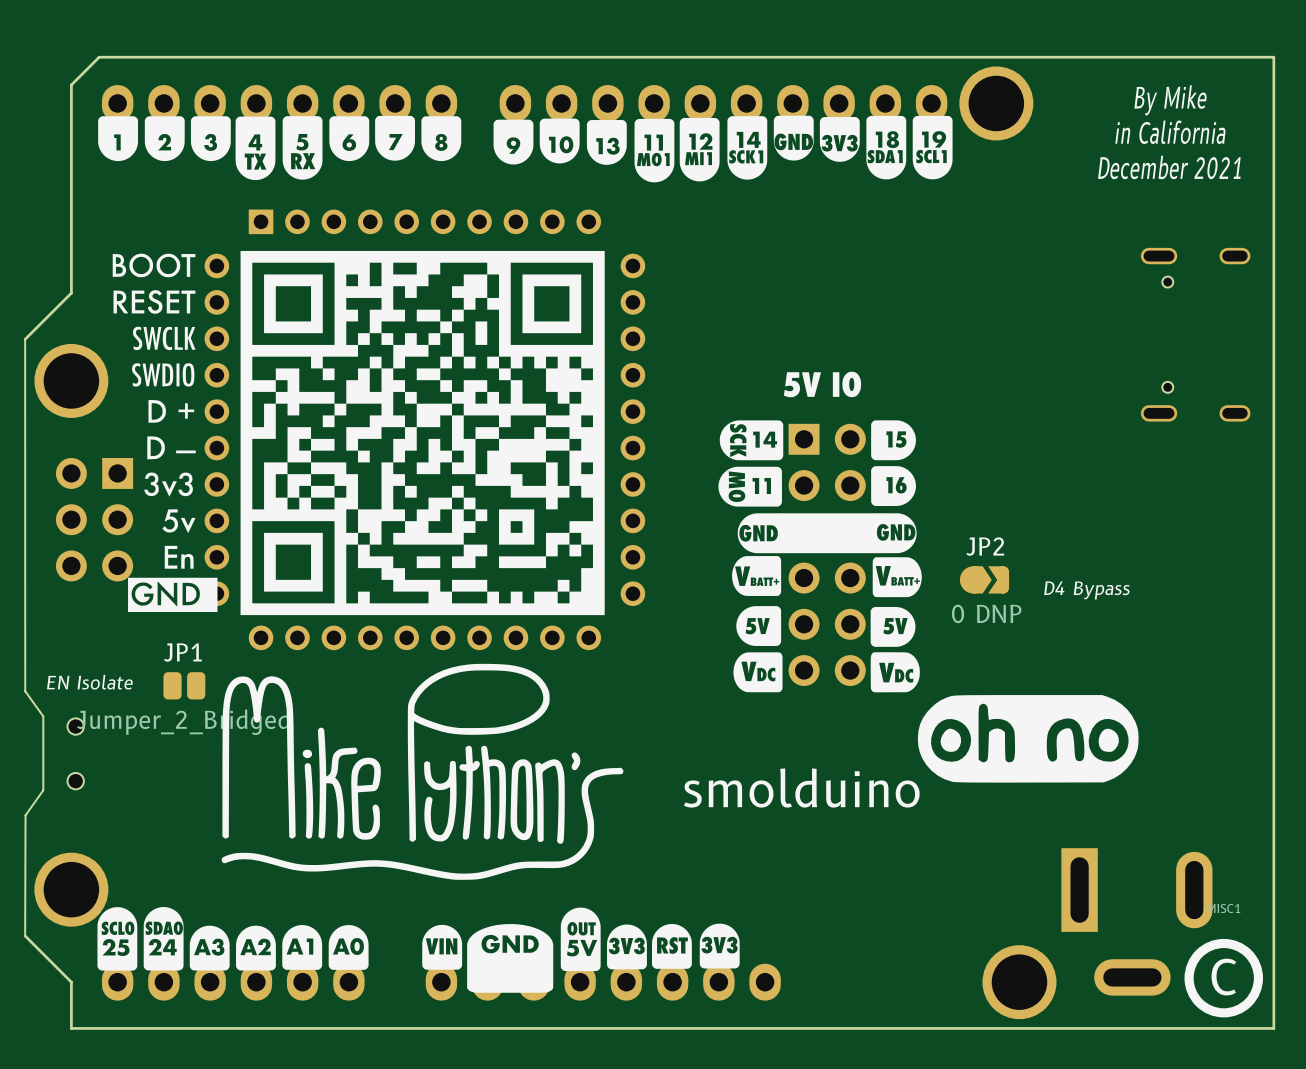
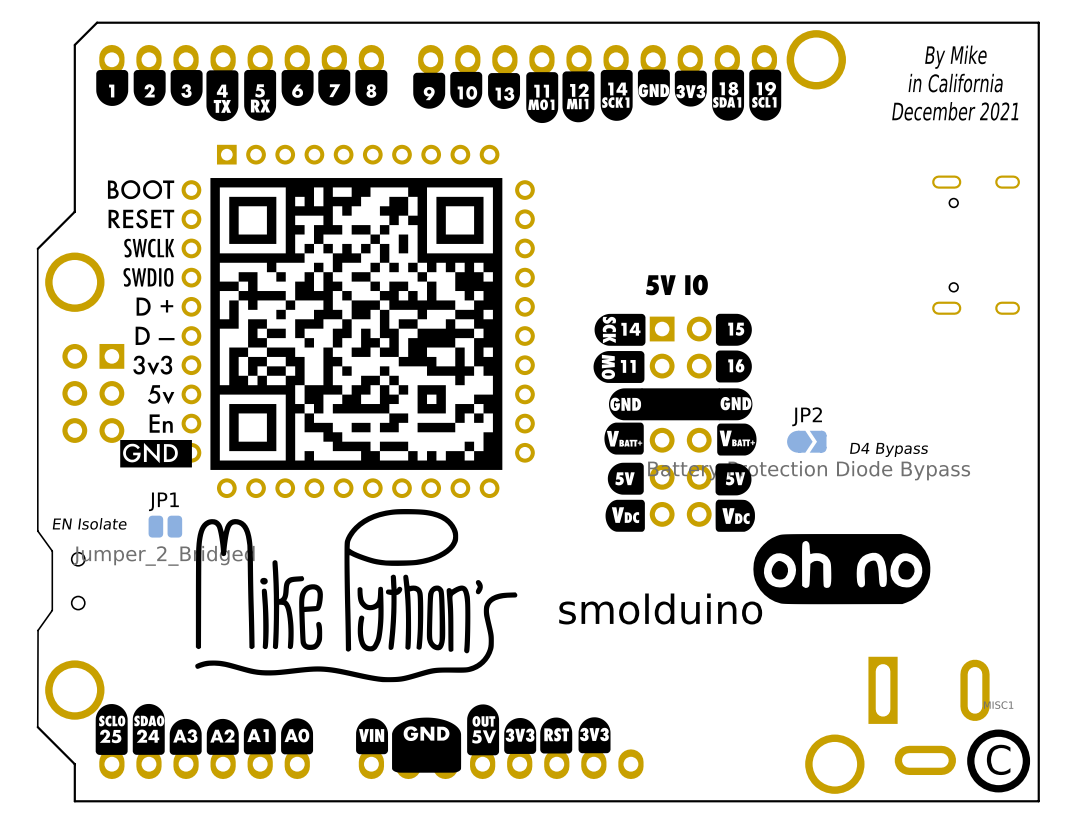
JP2 value: 0 DNP (986, 613) -> Battery Protection Diode Bypass (809, 470)

